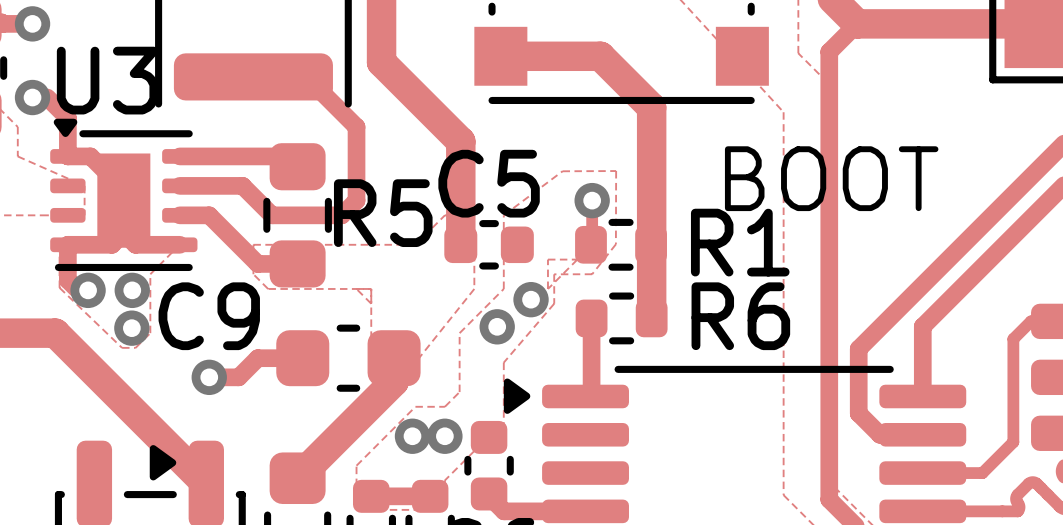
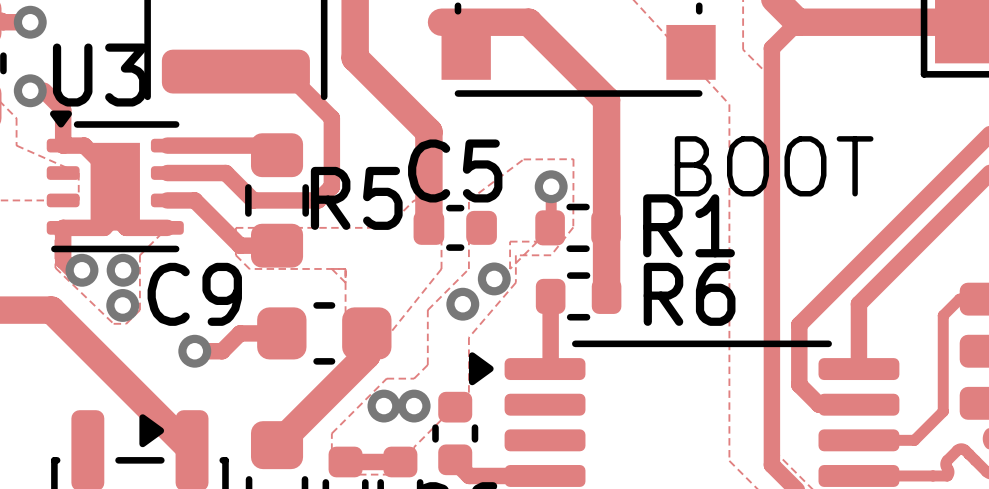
track: (506, 56) (600, 56) -> (441, 22) (528, 22) (558, 52)

